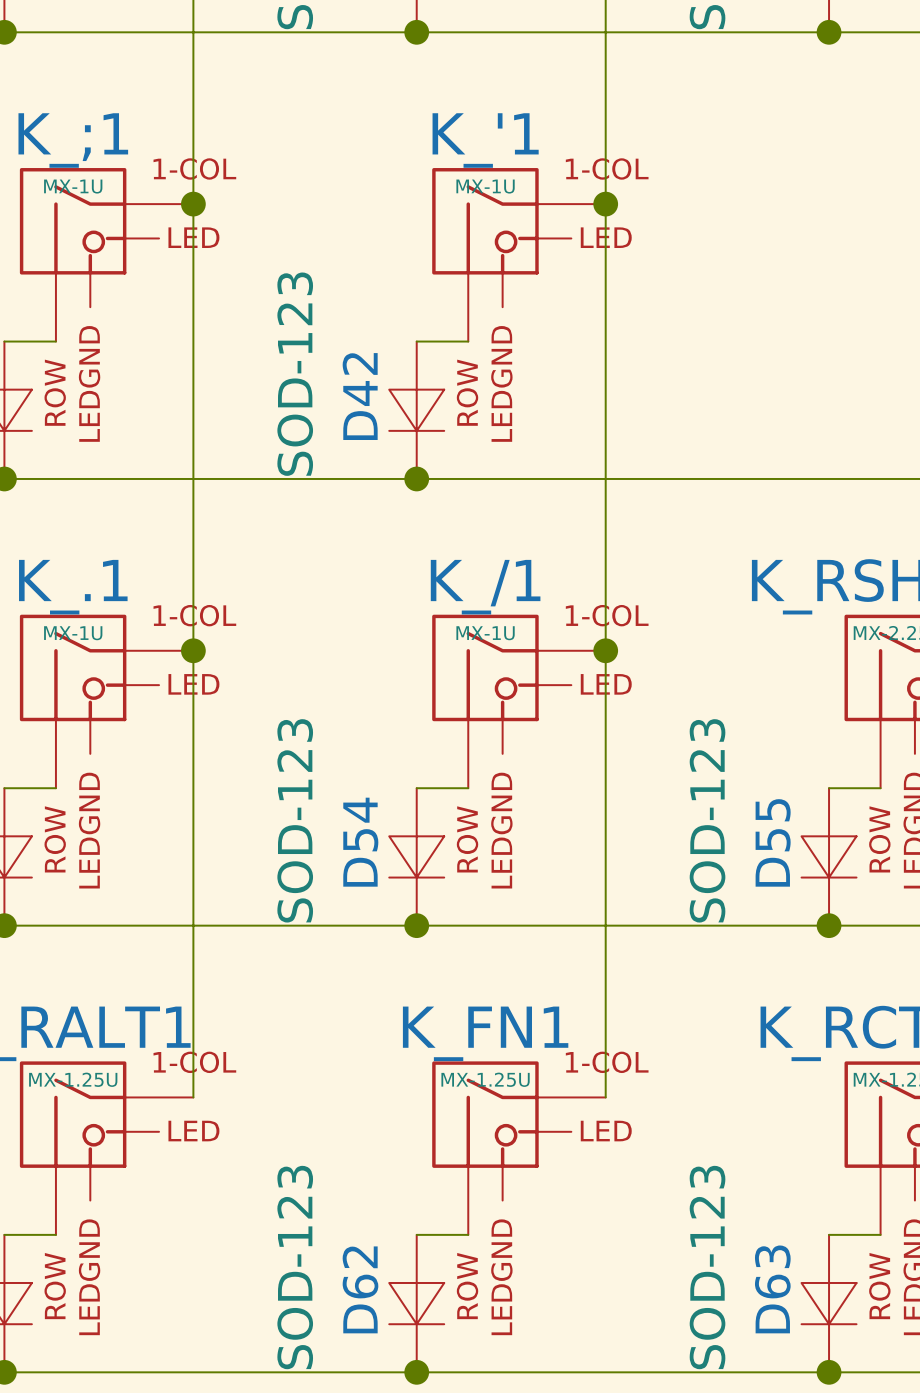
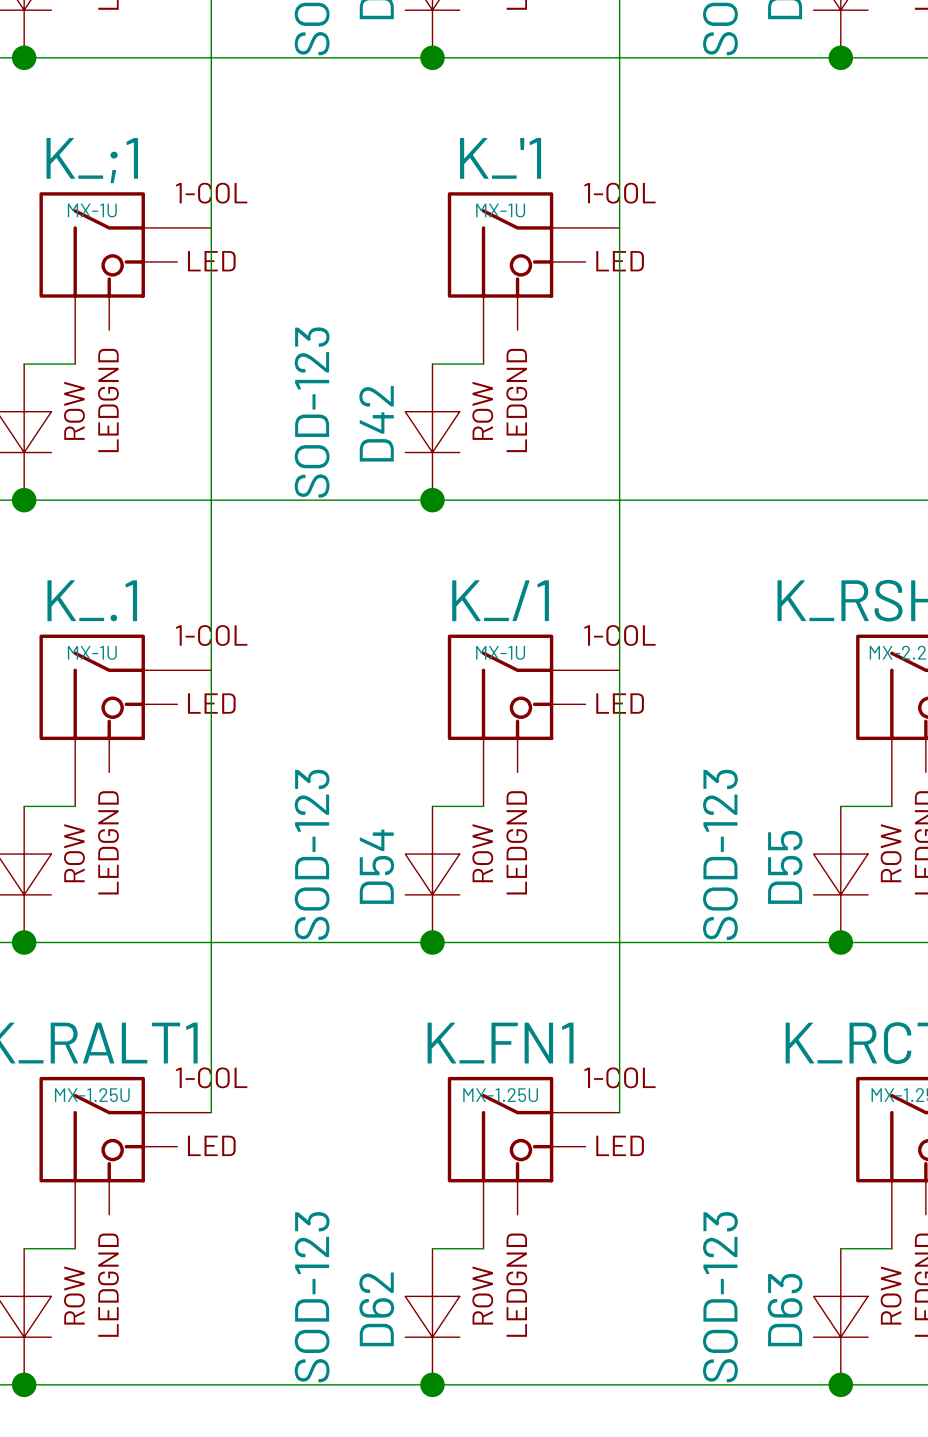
junction: (193, 204) -> none
junction: (605, 204) -> none
junction: (193, 650) -> none
junction: (605, 650) -> none

